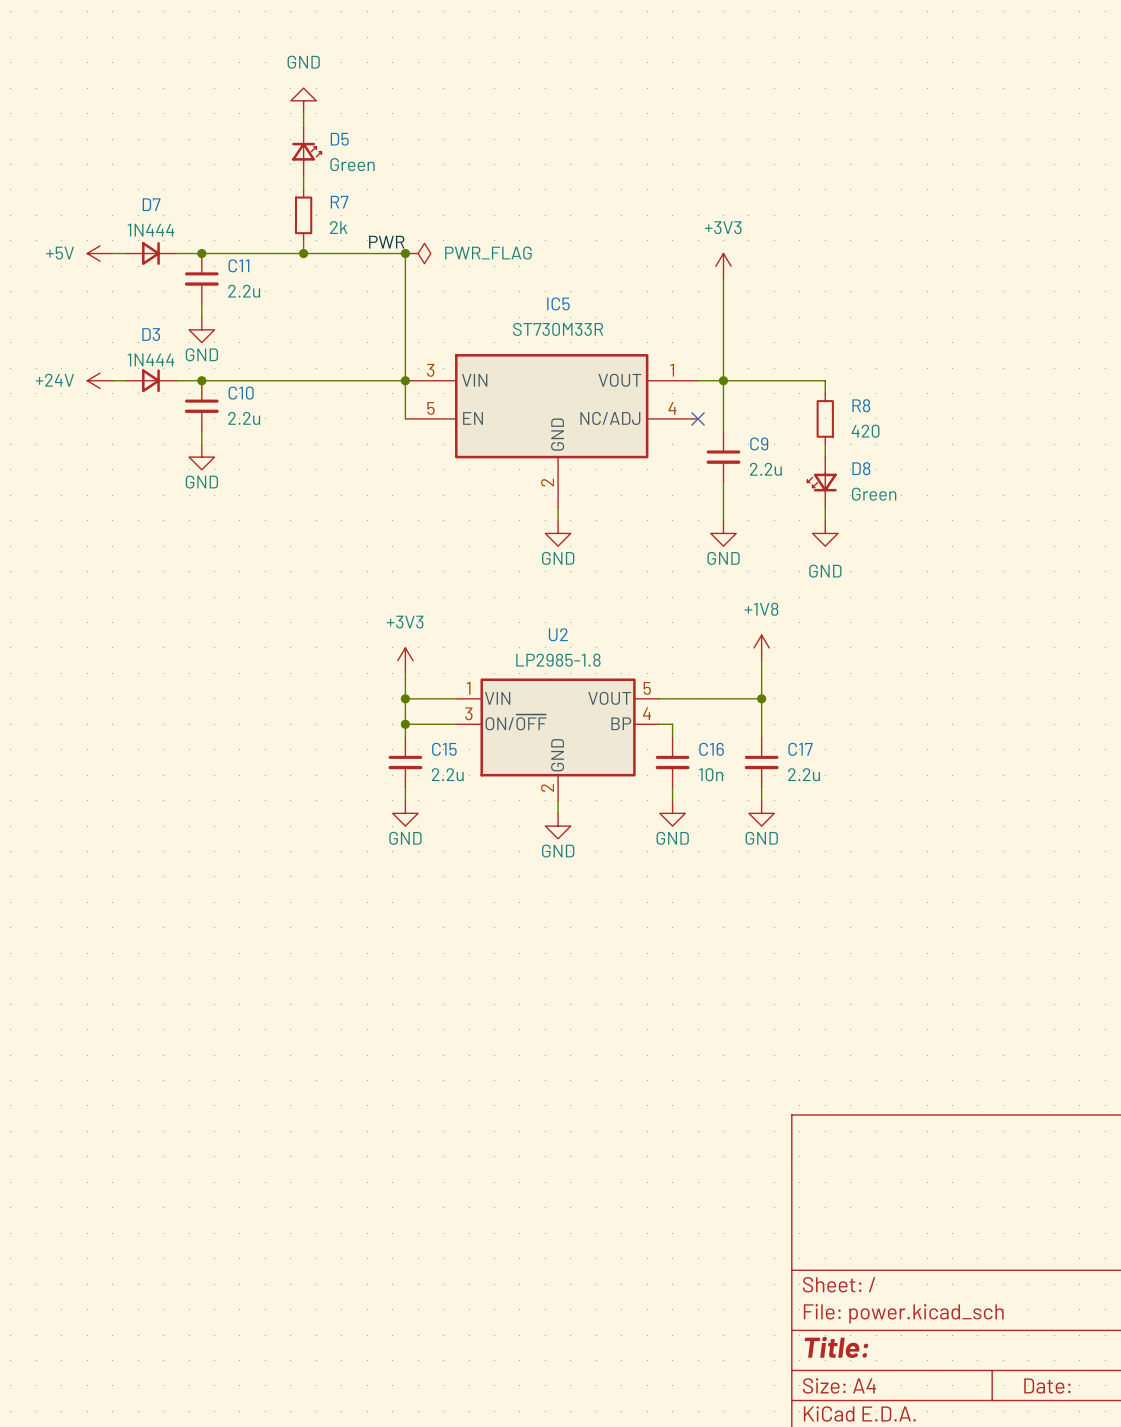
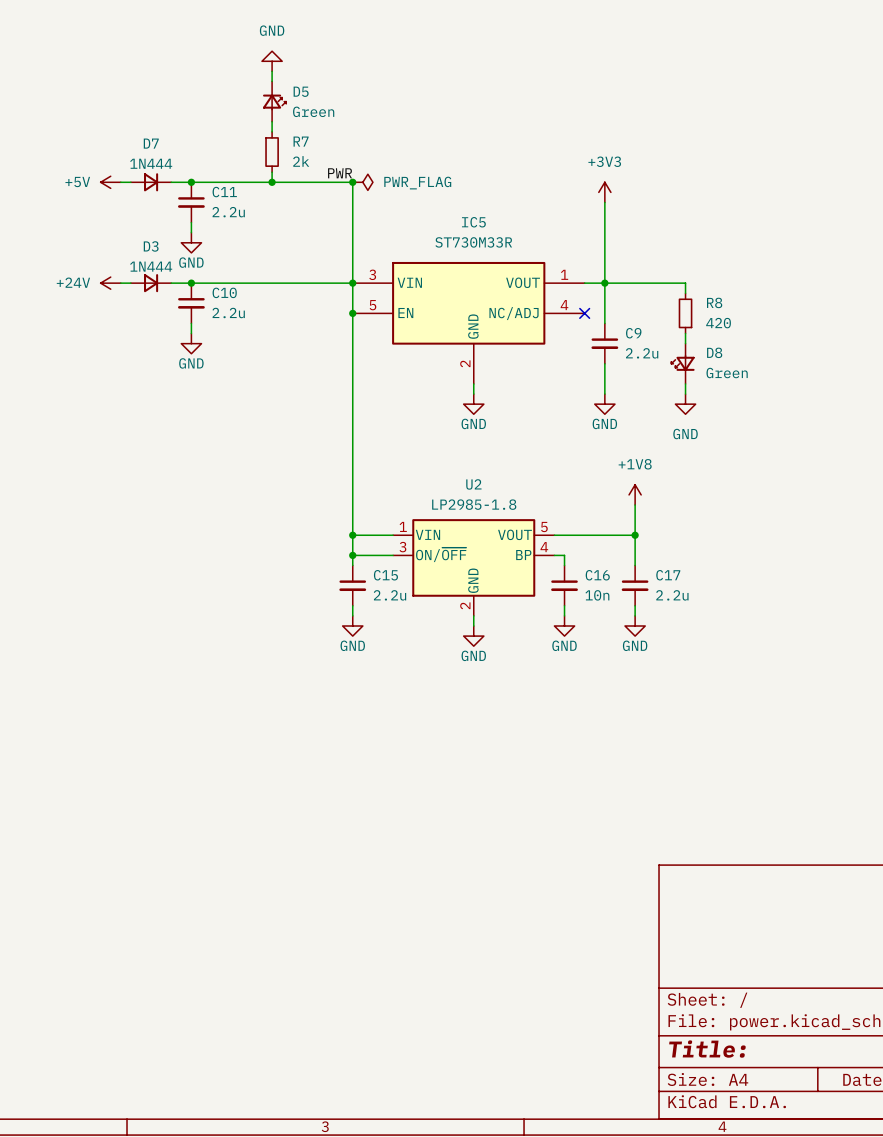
wire: none -> (352, 313) (352, 515)
junction: none -> (352, 313)
power symbol: +3V3 (405, 660) -> none

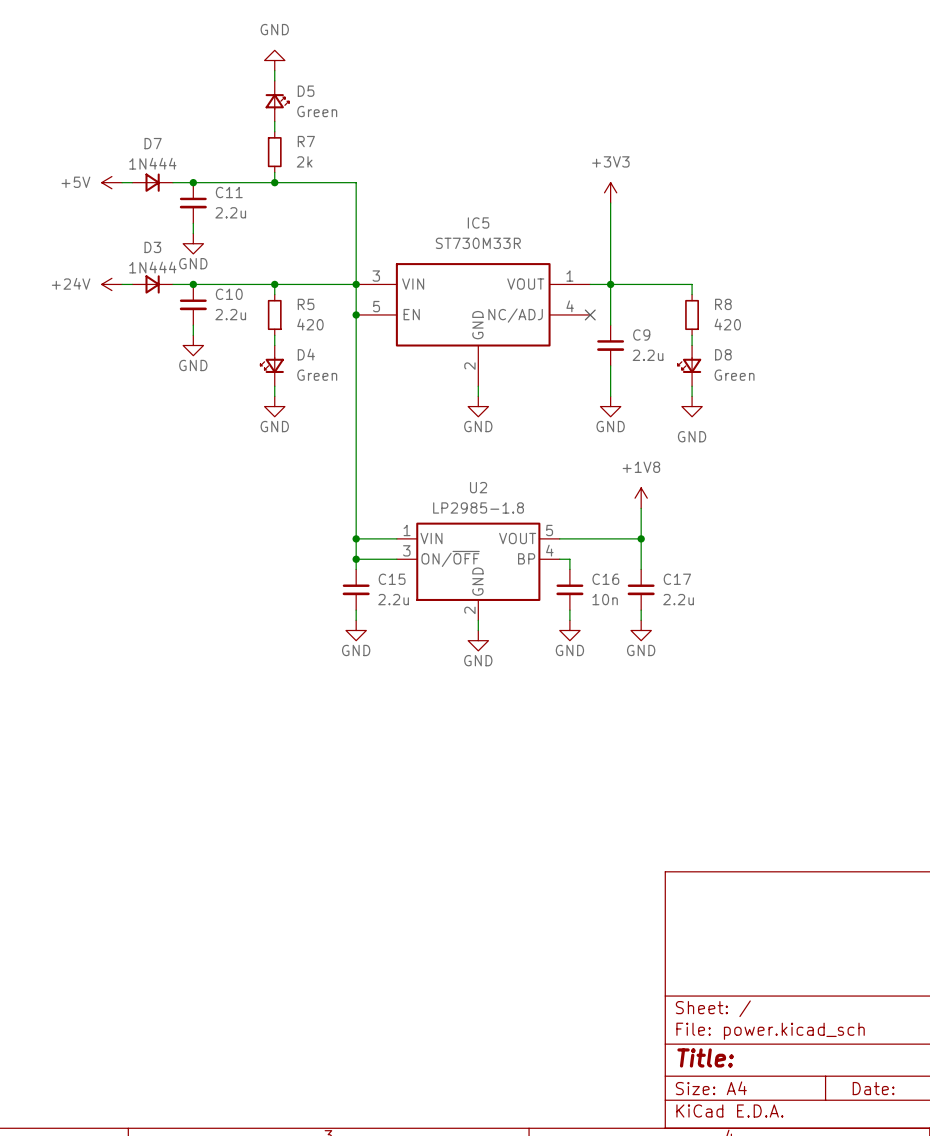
label: PWR (340, 173) -> none
junction: (352, 182) -> none
power symbol: PWR_FLAG (362, 182) -> none
wire: none -> (274, 284) (274, 294)
junction: none -> (274, 284)
R5: none -> 420 (274, 314)
wire: none -> (274, 335) (274, 345)
D4: none -> Green (272, 365)
wire: none -> (274, 386) (274, 396)
power symbol: none -> GND (274, 406)

